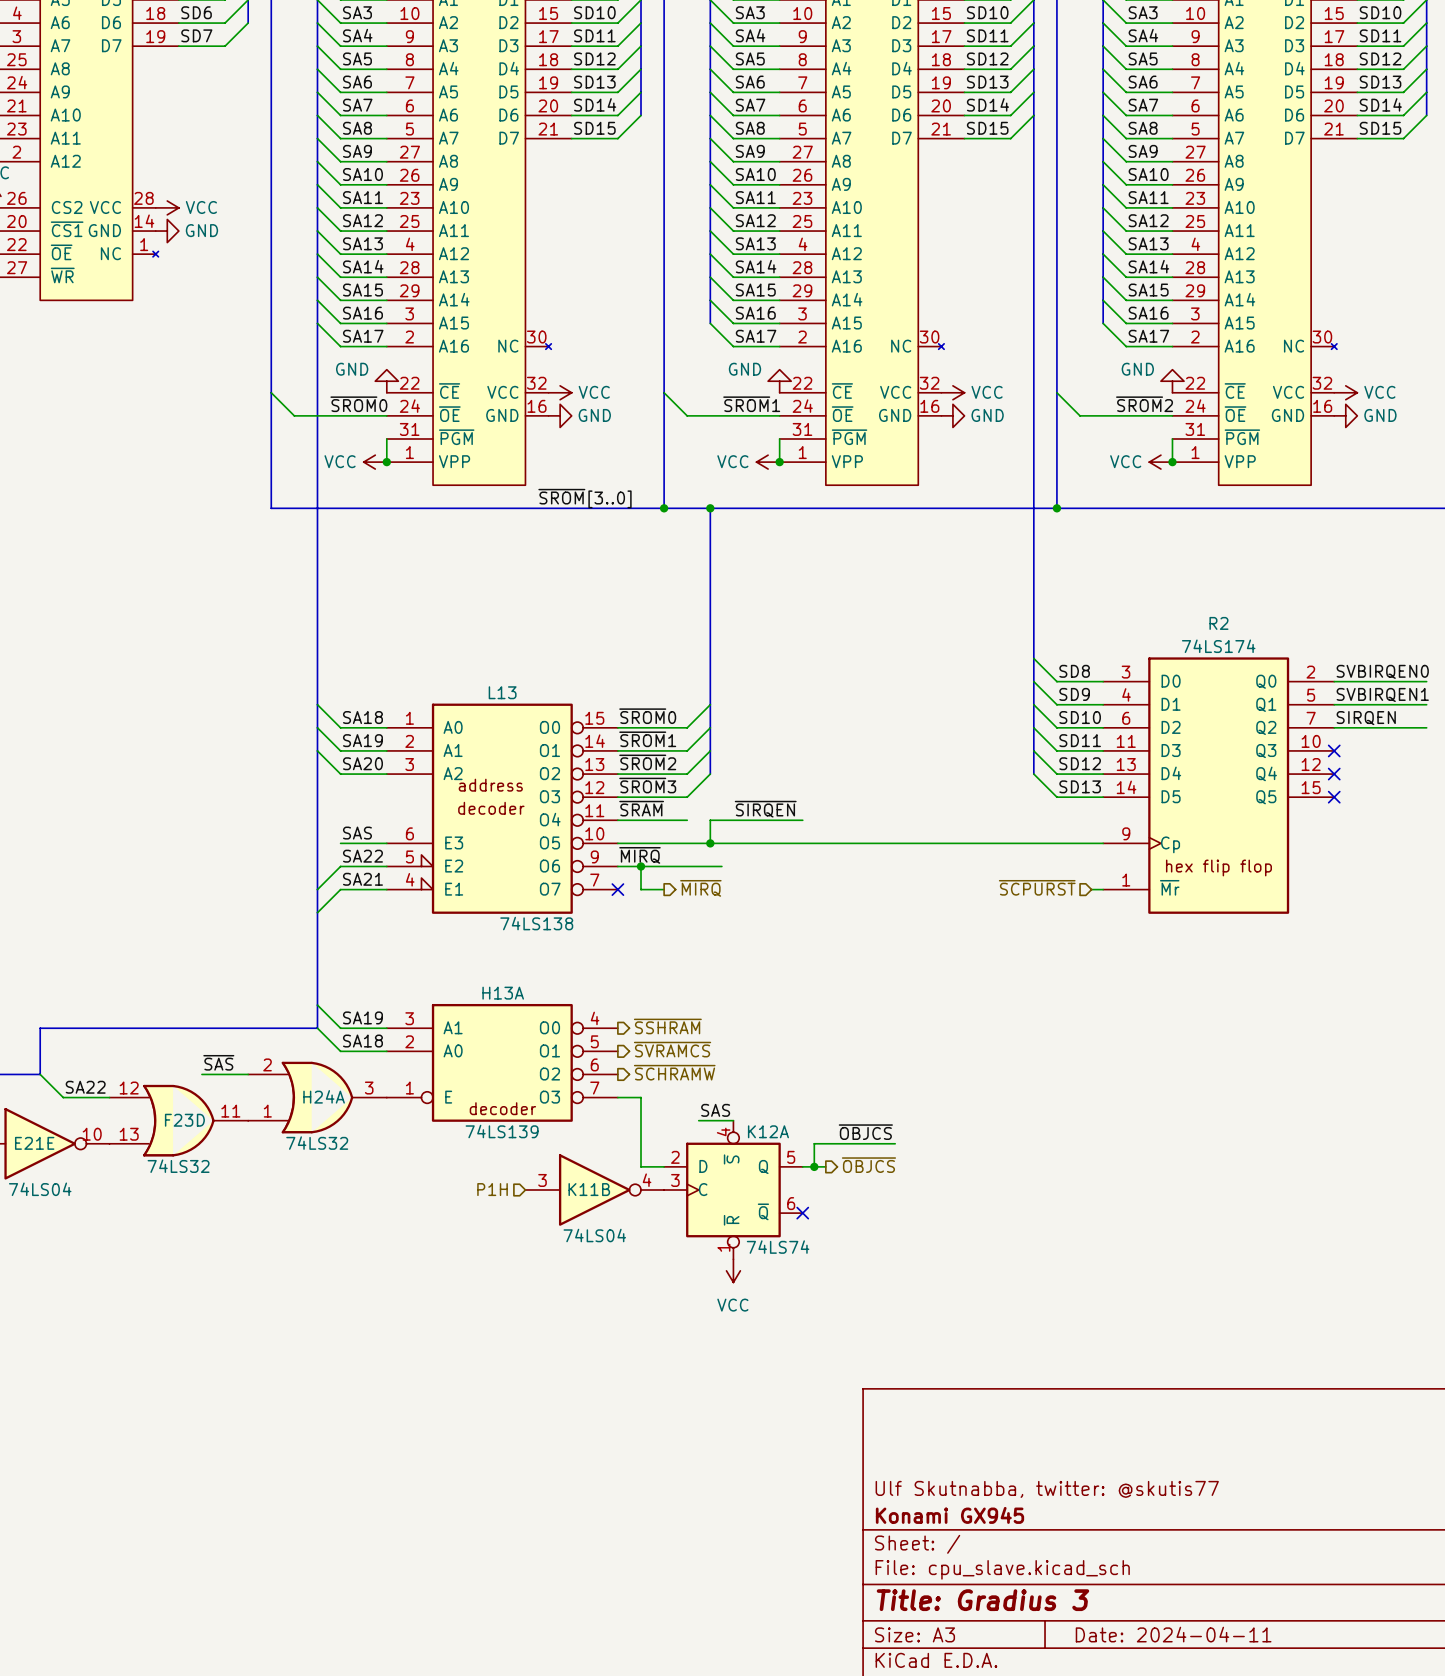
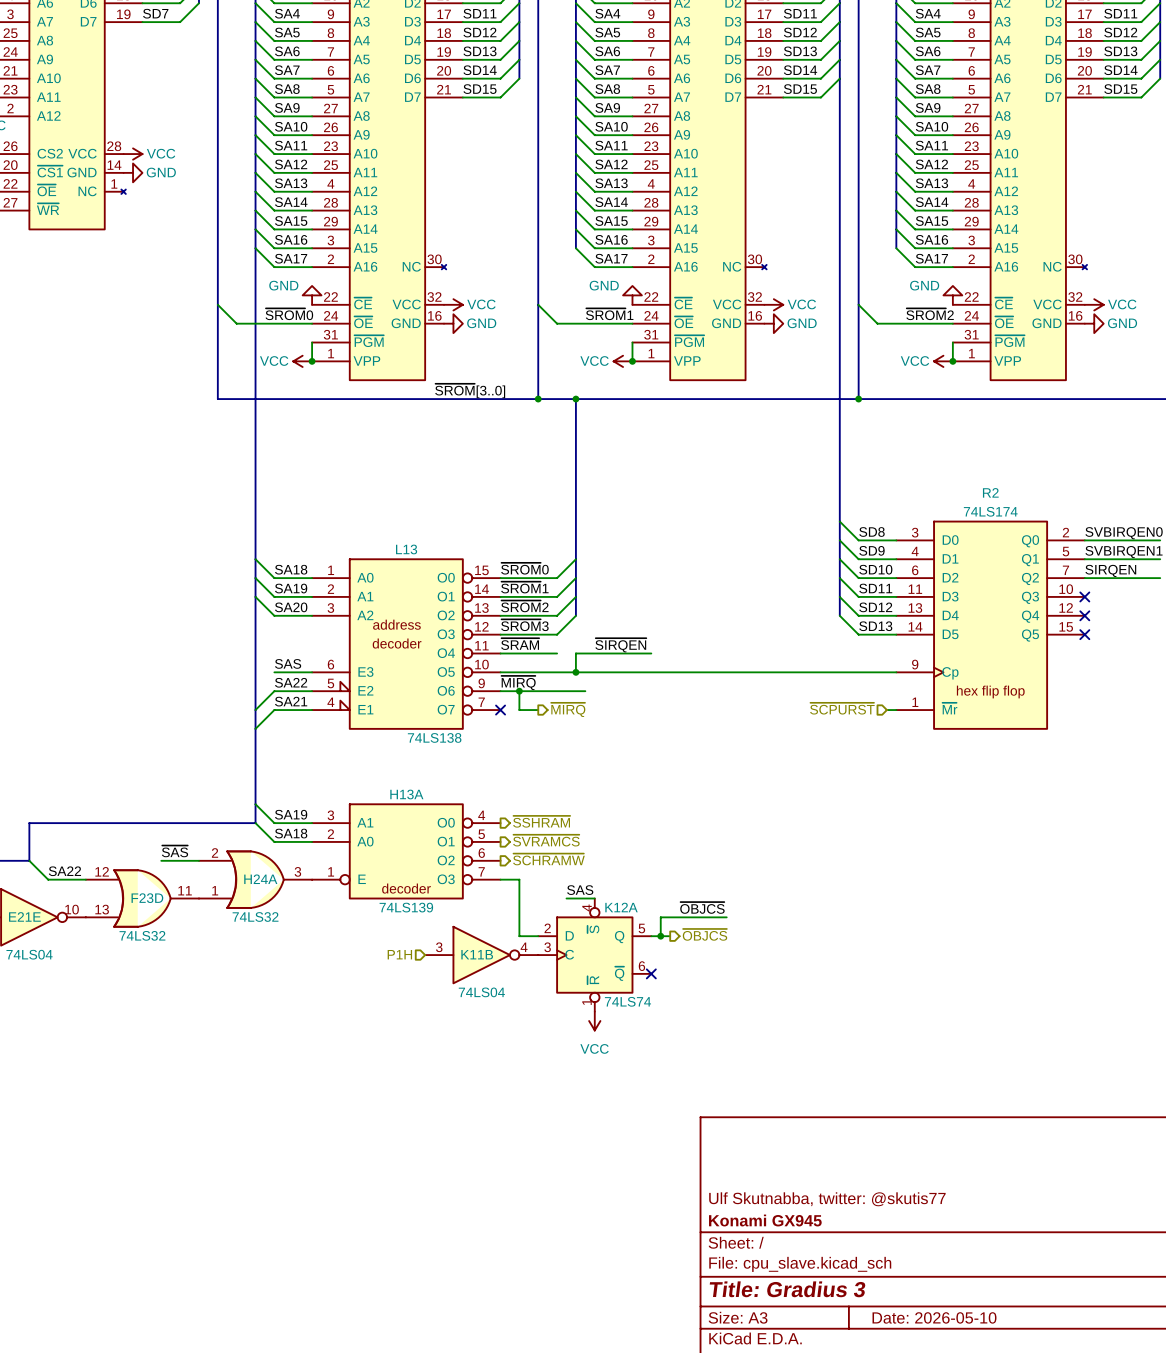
title block: Date: 2024-04-11 (1173, 1634) -> Date: 2026-05-10 (934, 1317)

